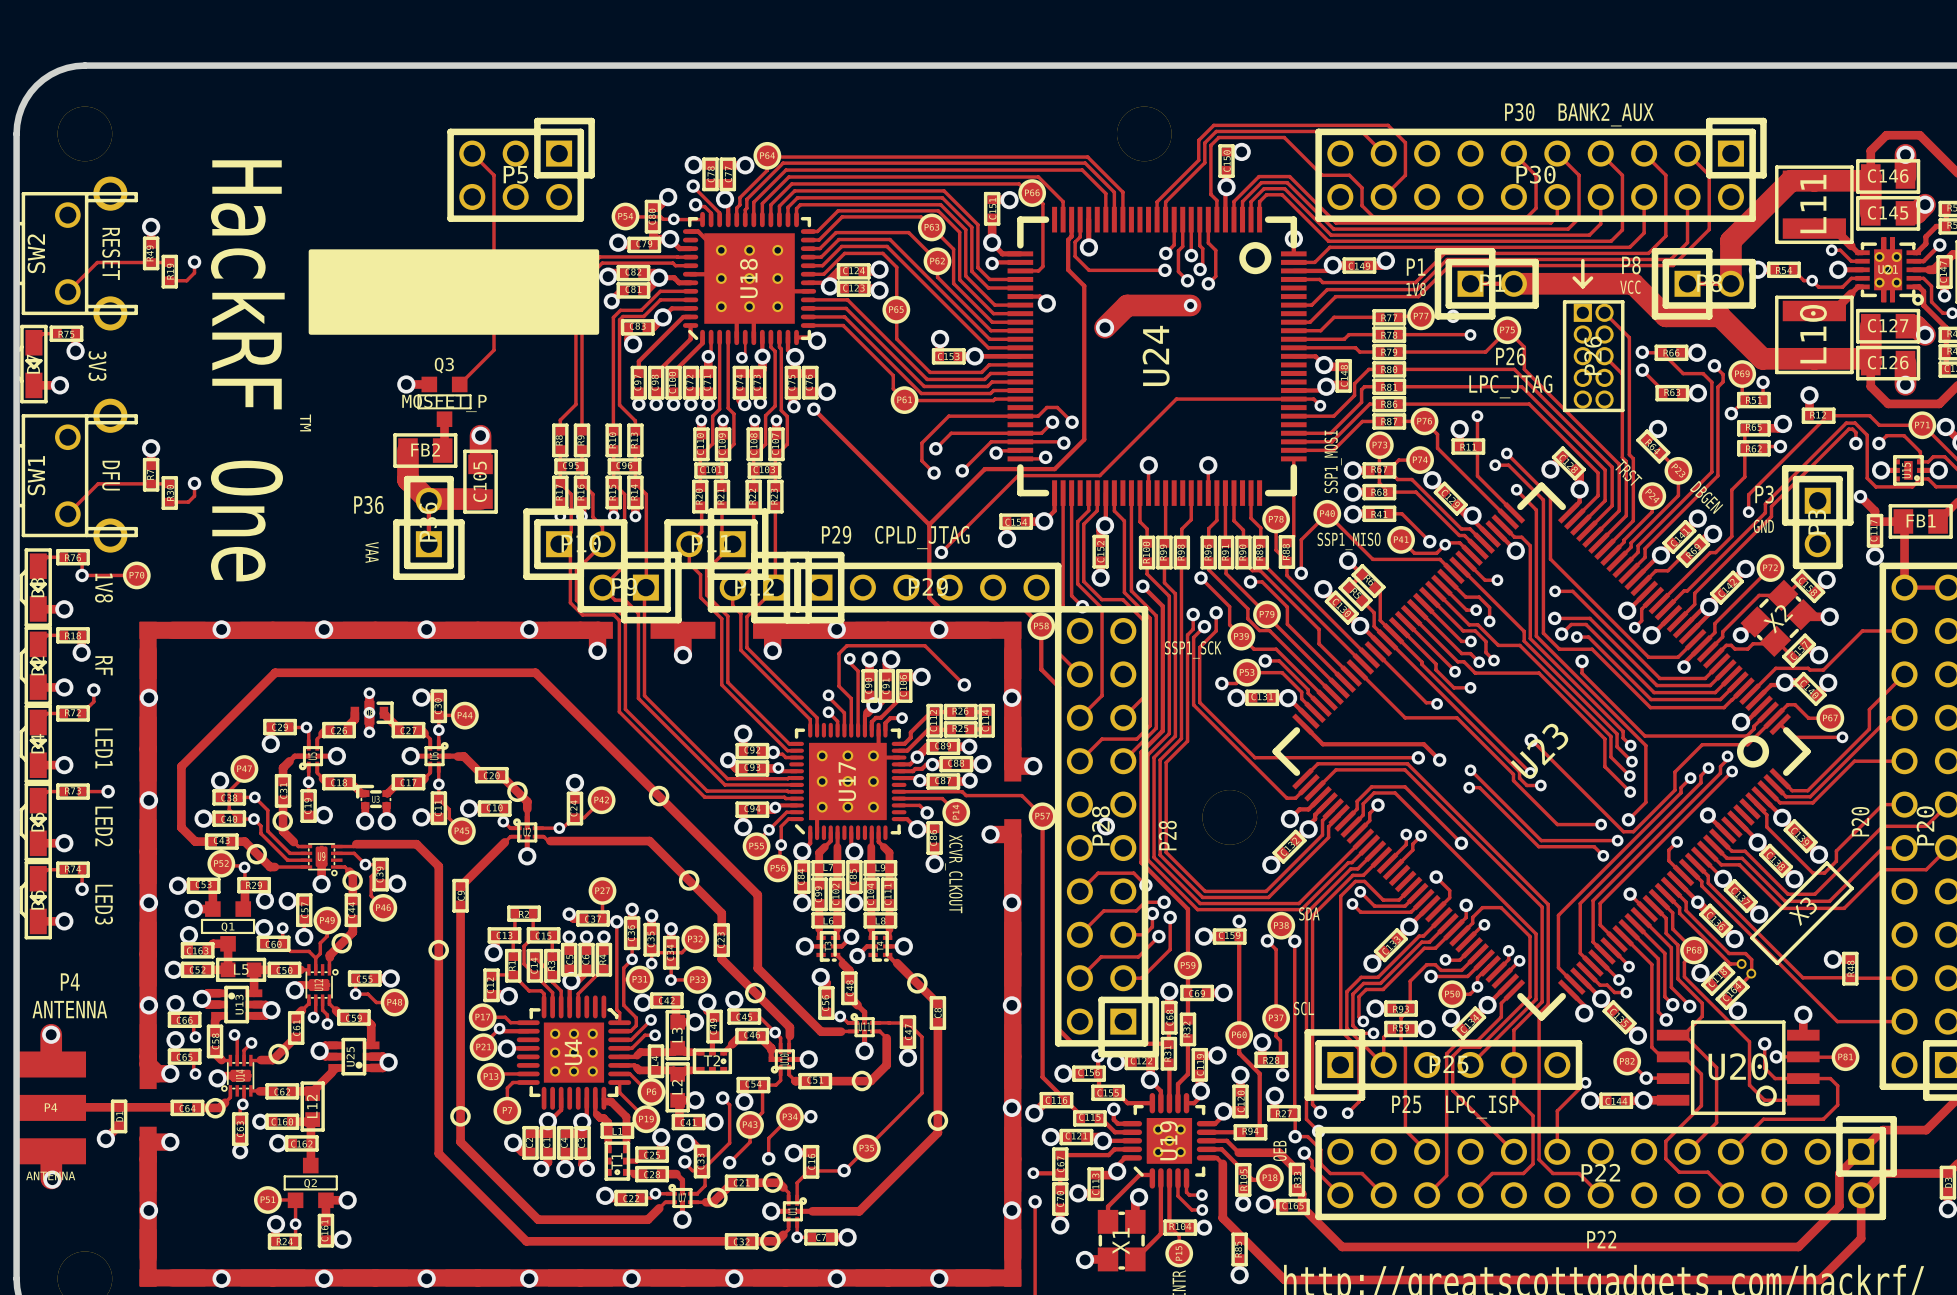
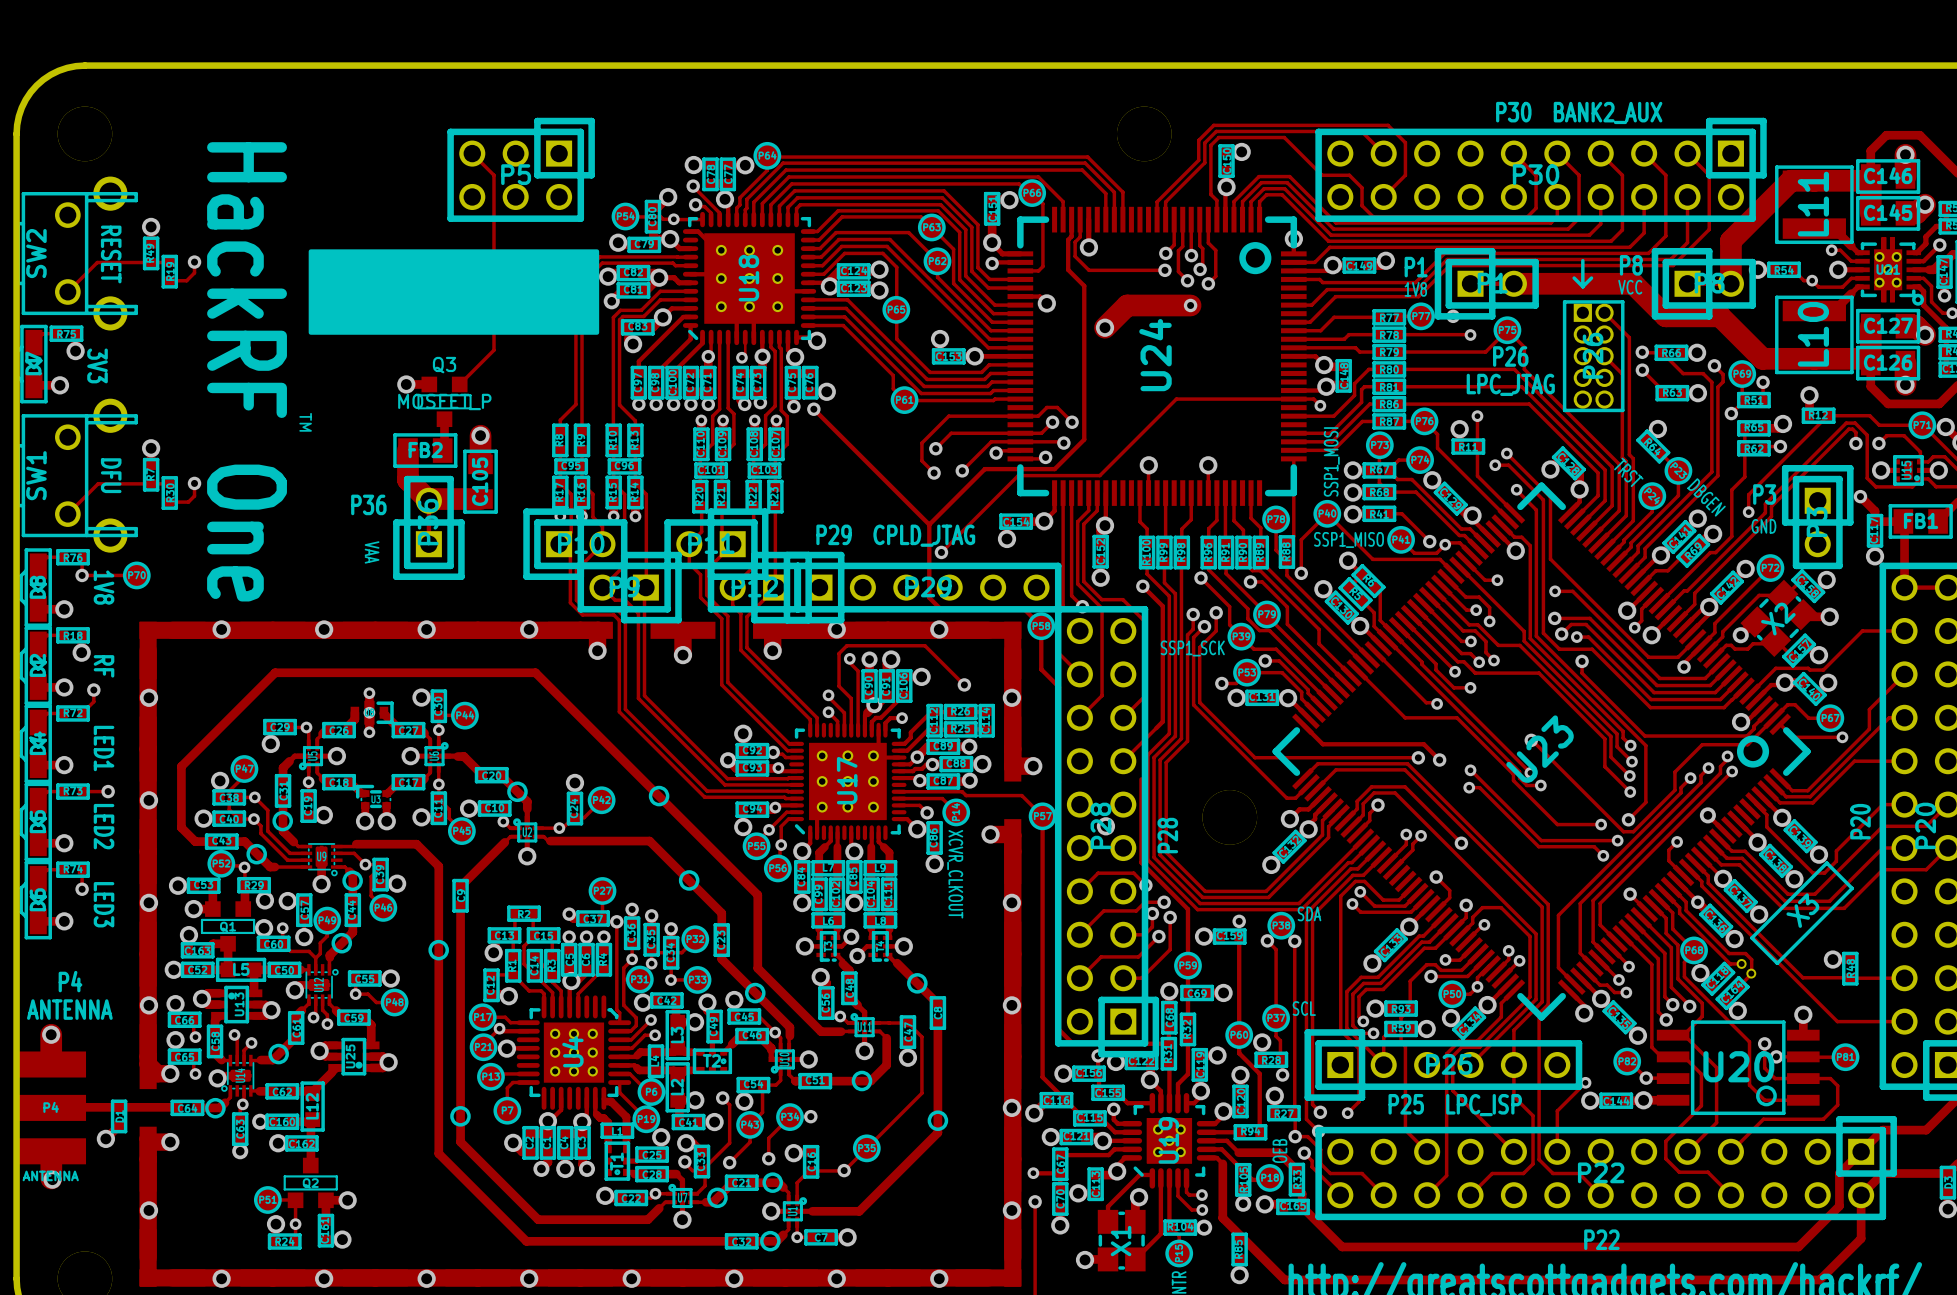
track: (1114, 493) (1114, 510) (1124, 520) (1124, 592) (1150, 618) (1150, 725) (1136, 739) (1102, 739) (1079, 761) -> none
track: (1131, 493) (1131, 590) (1156, 615) (1156, 728) -> none
track: (1162, 721) (1162, 730) (1141, 752) (1141, 779) -> (1162, 721) (1156, 728)

